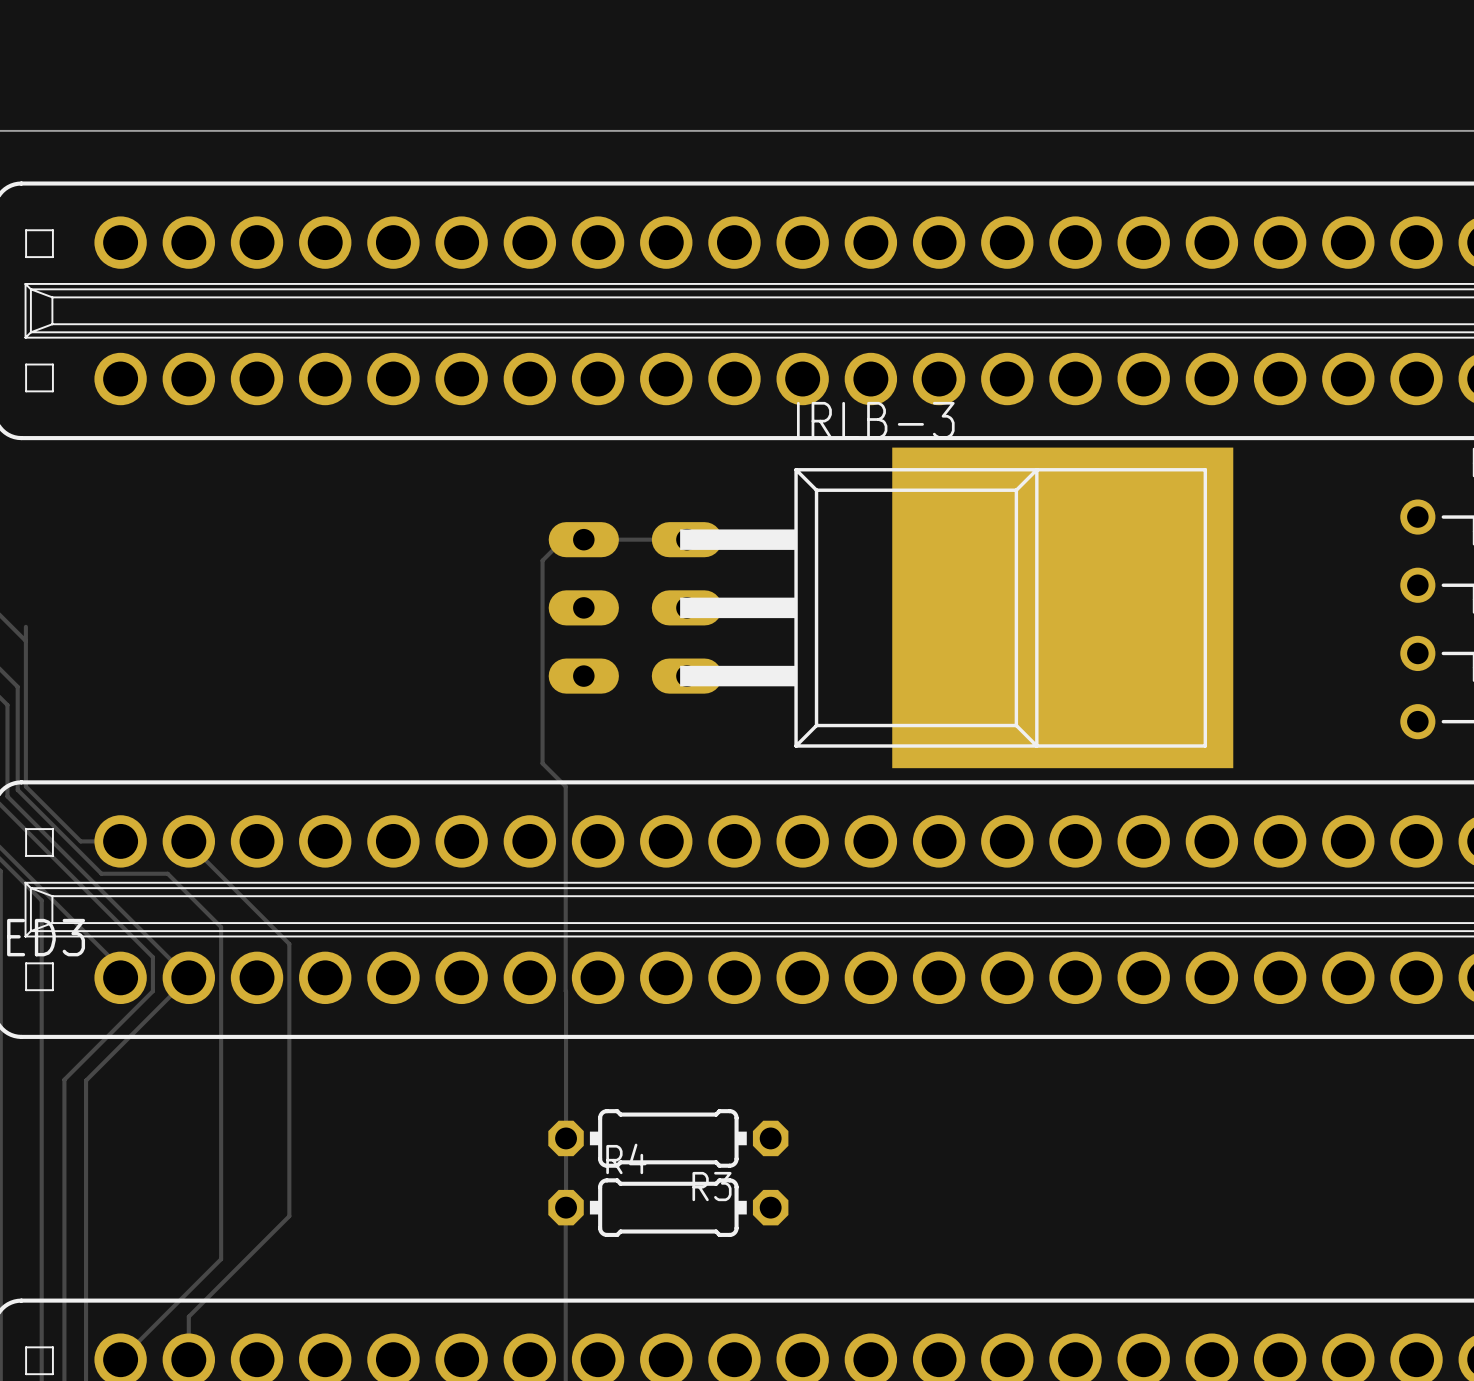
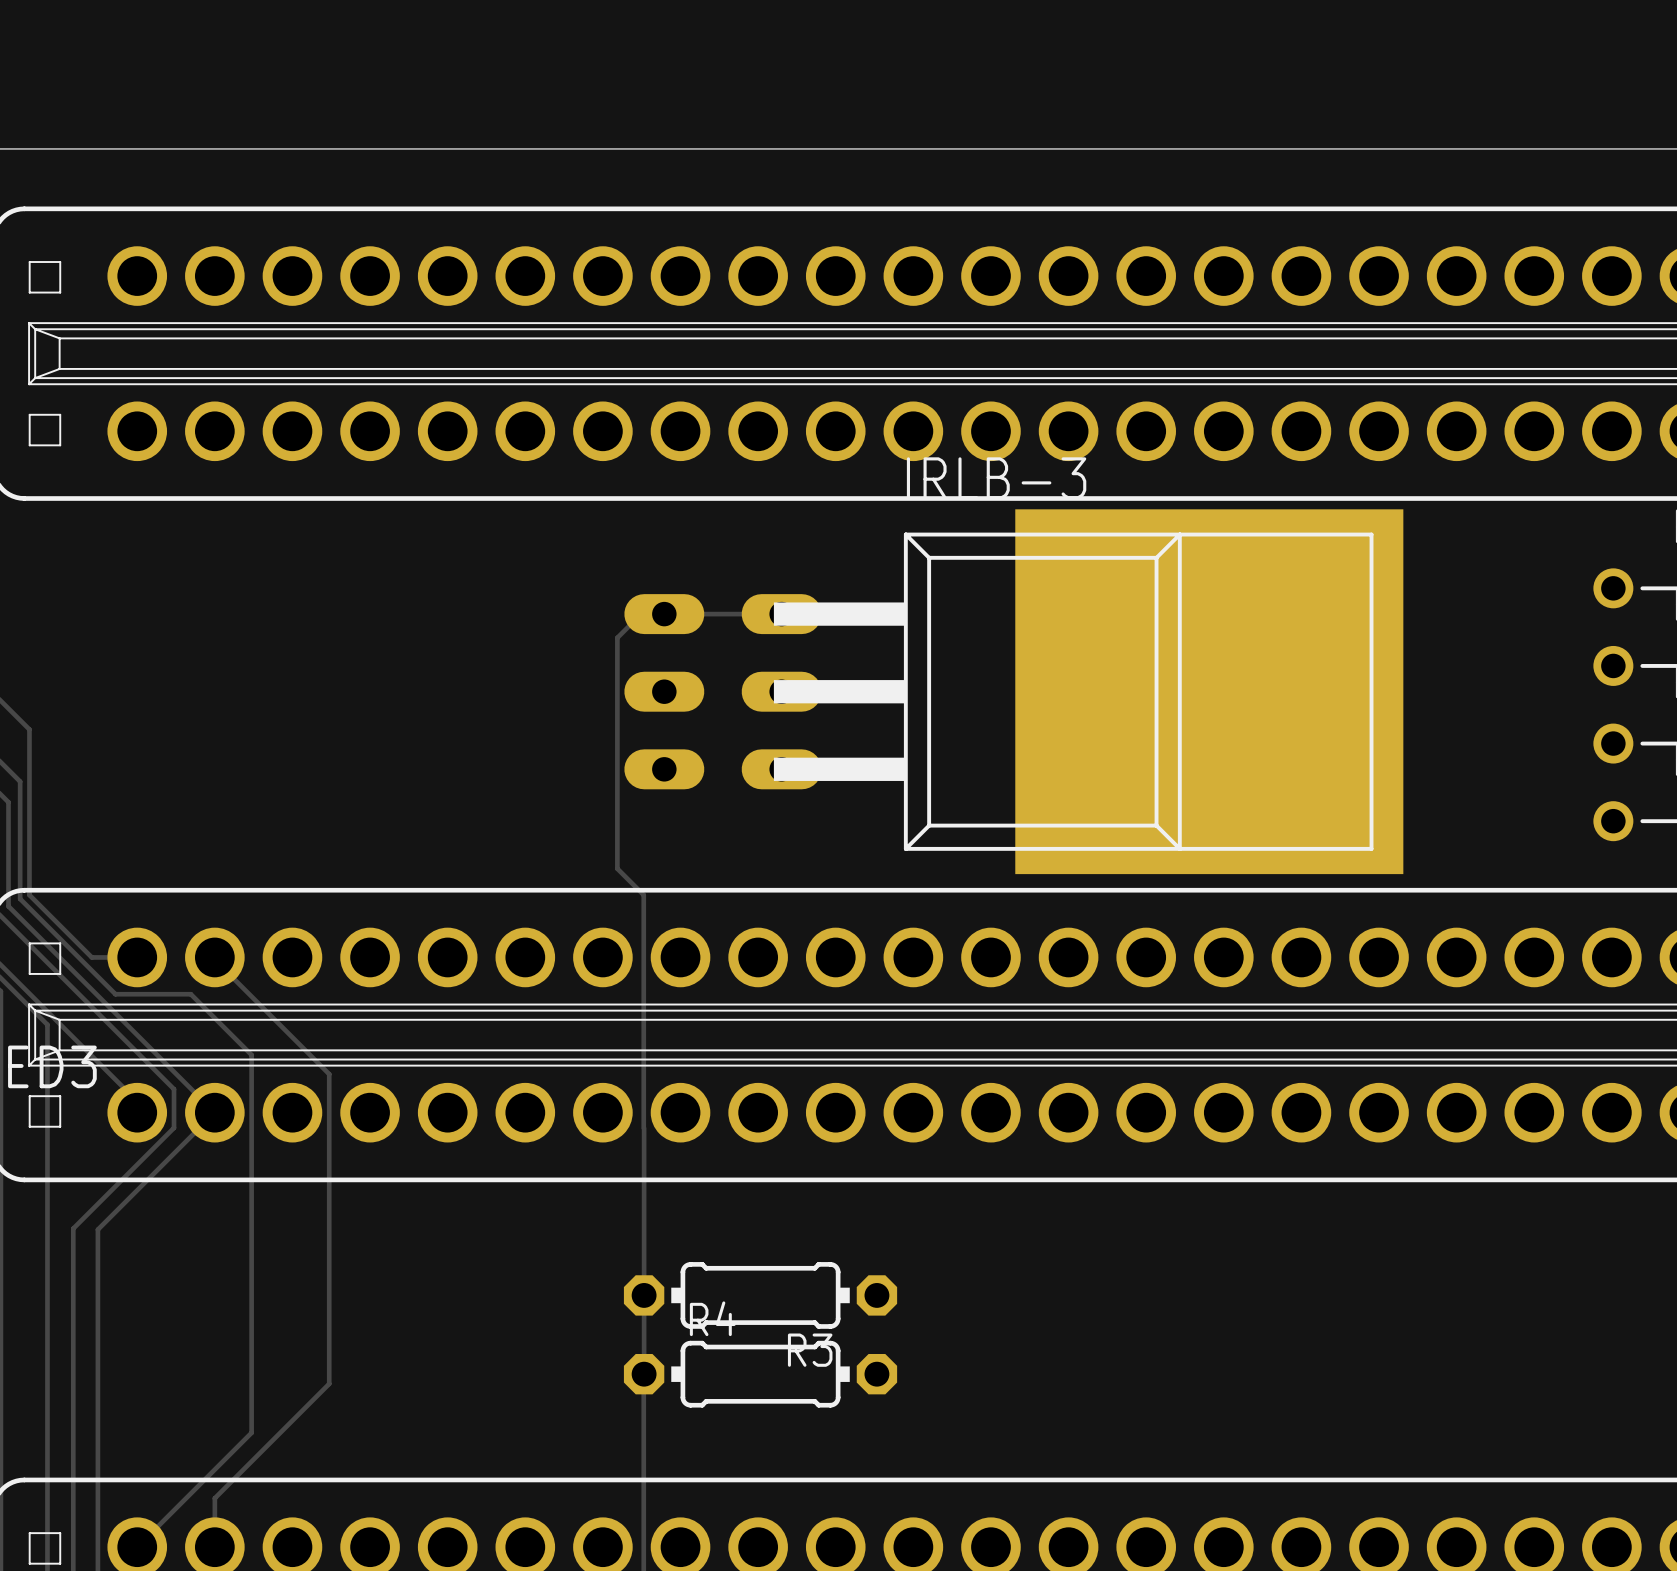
track: (25, 626) (25, 641) -> none

